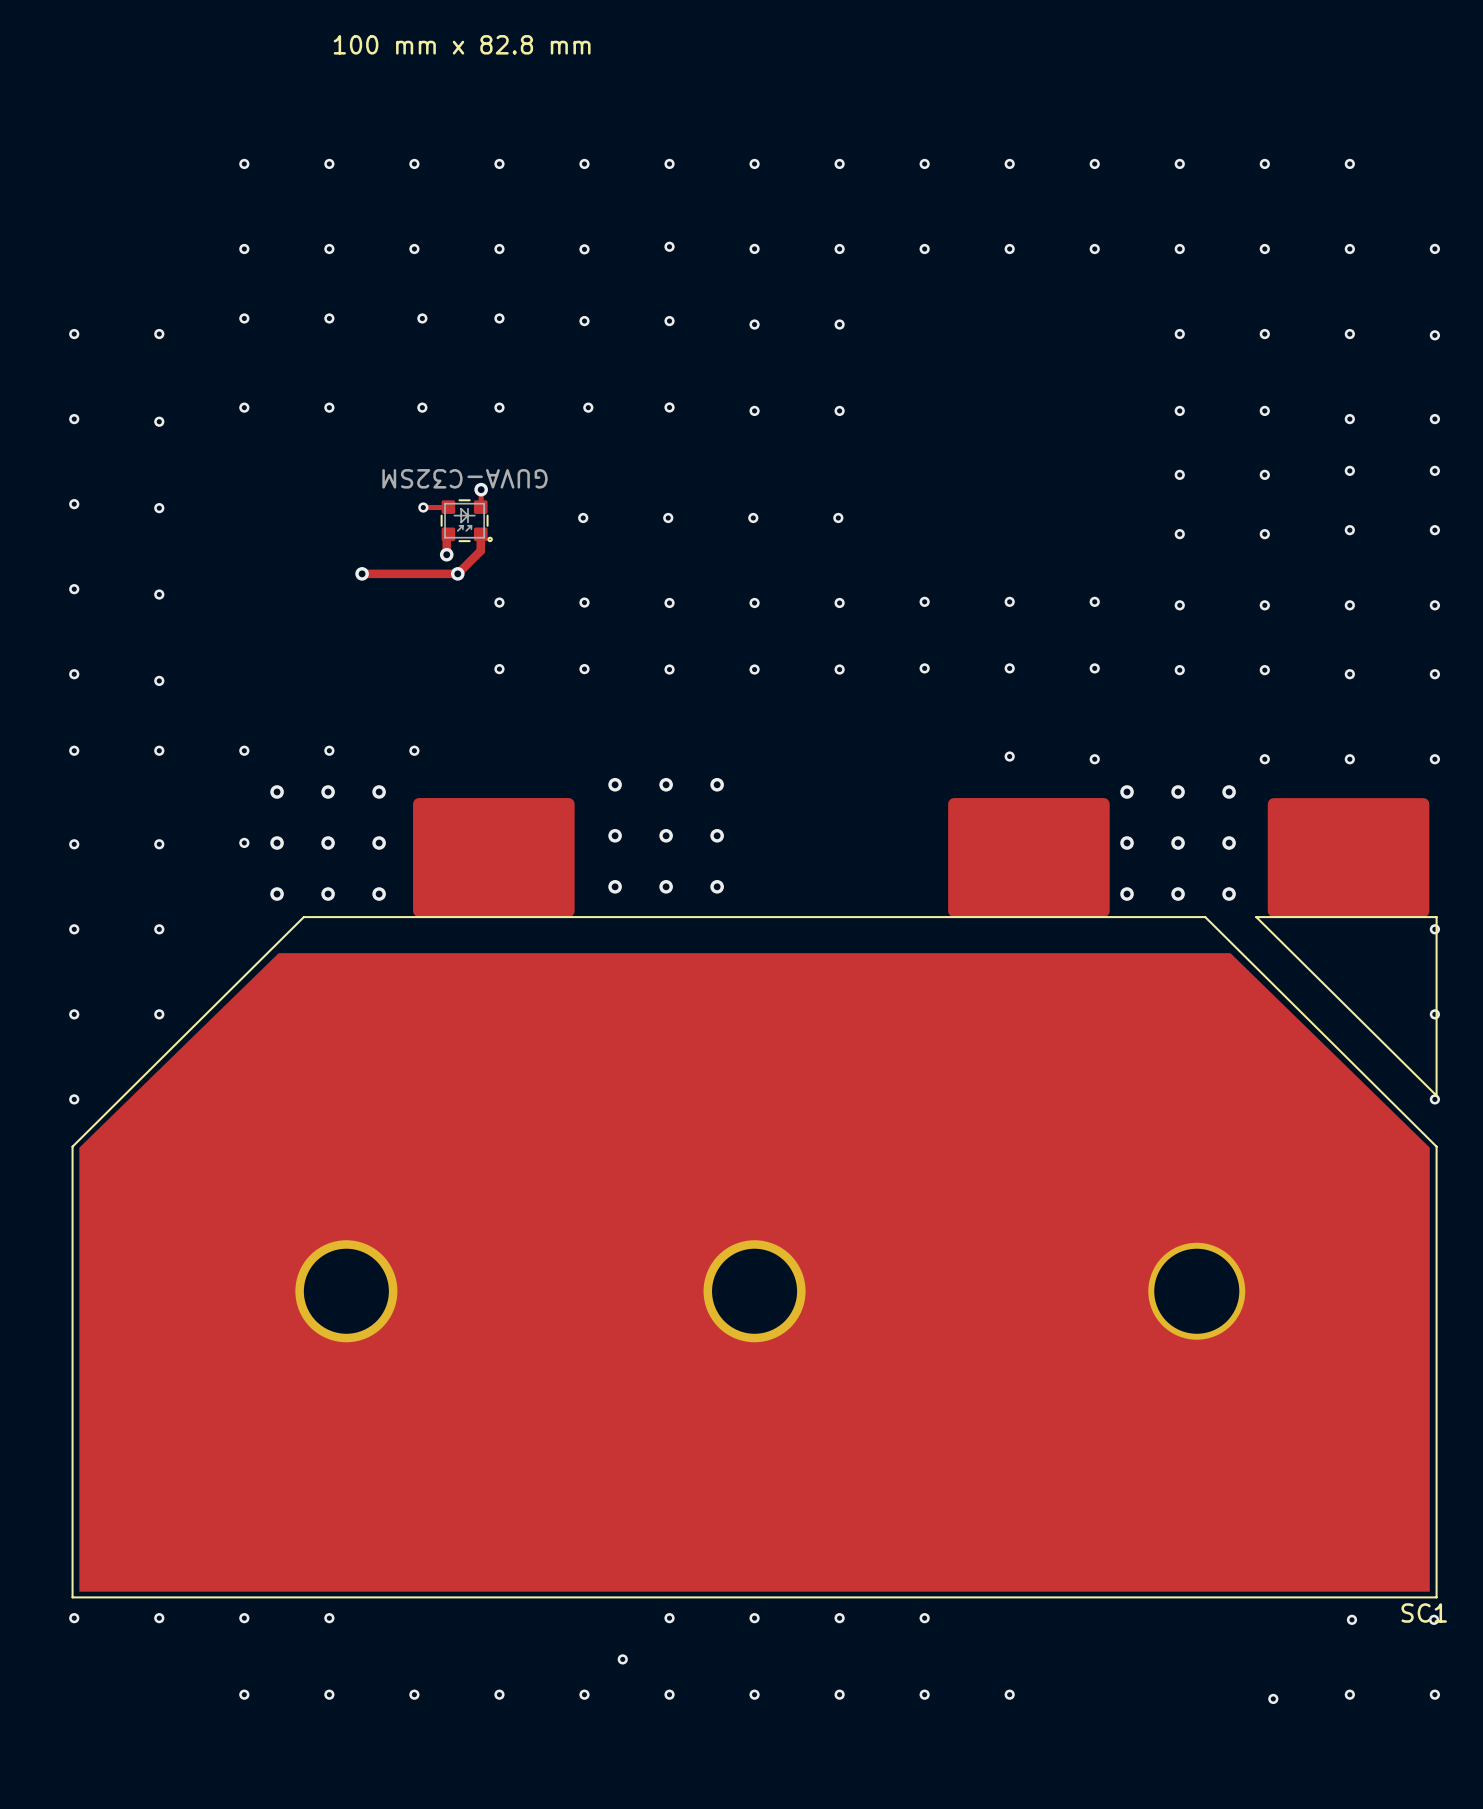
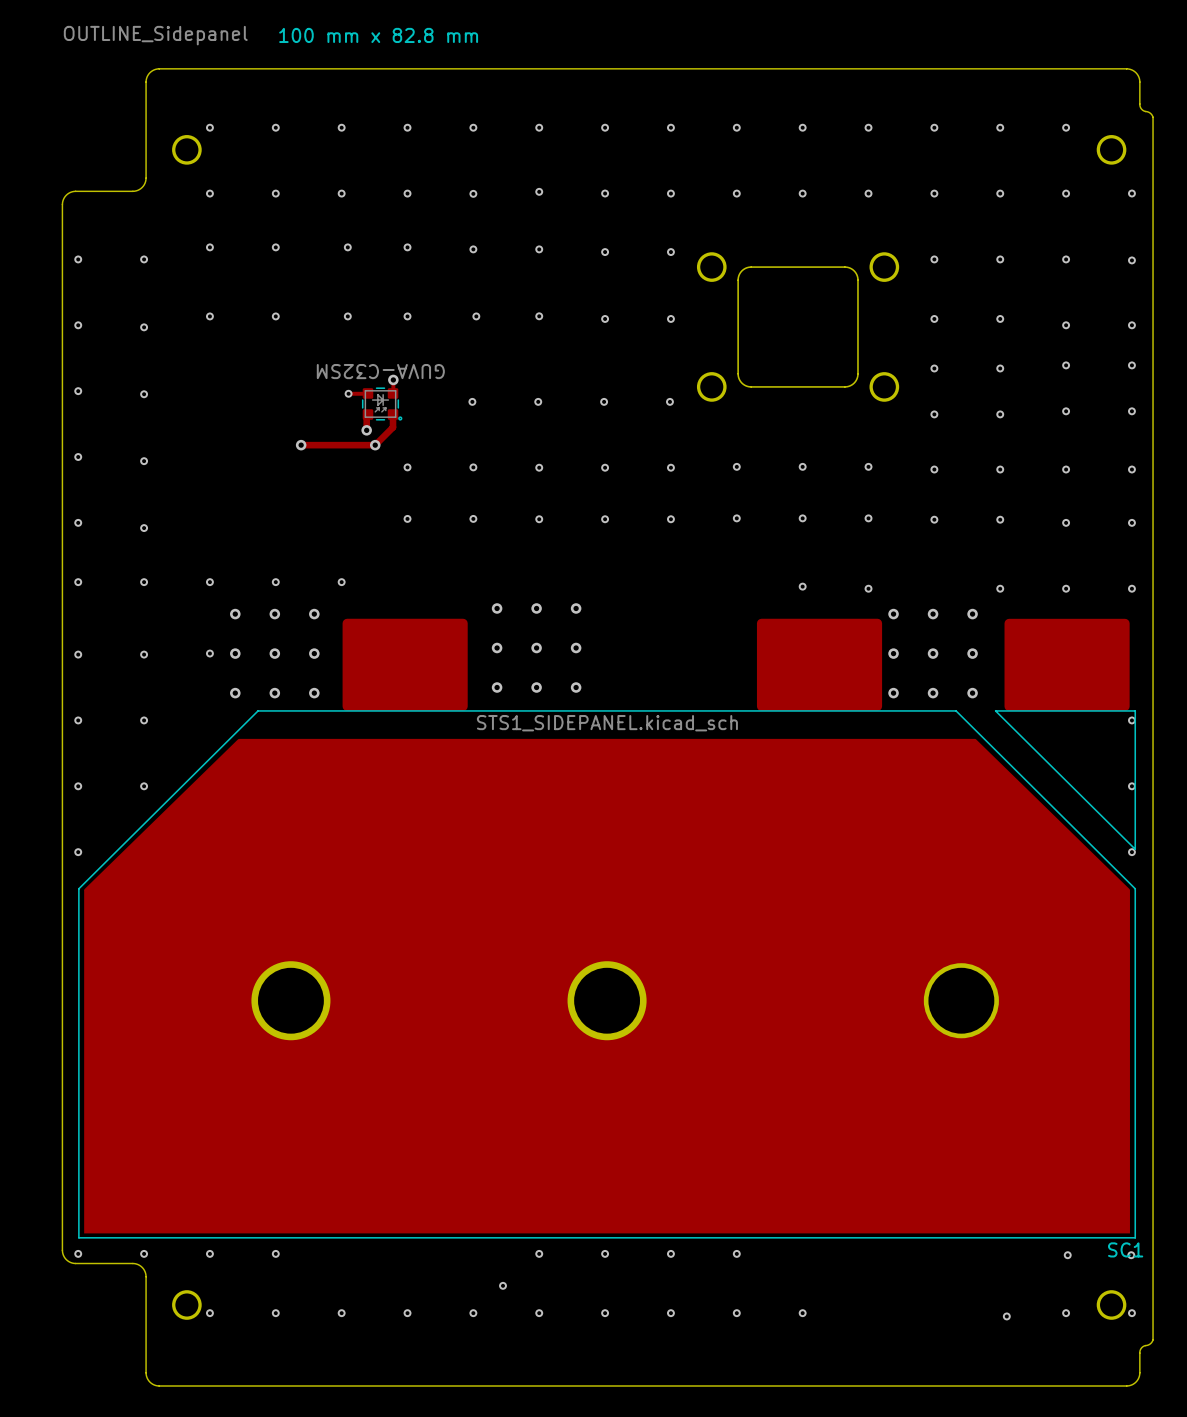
drawing: none -> [61, 68, 1154, 1387]
SC1 footprint: [71, 798, 1438, 1599] -> [78, 618, 1137, 1239]

